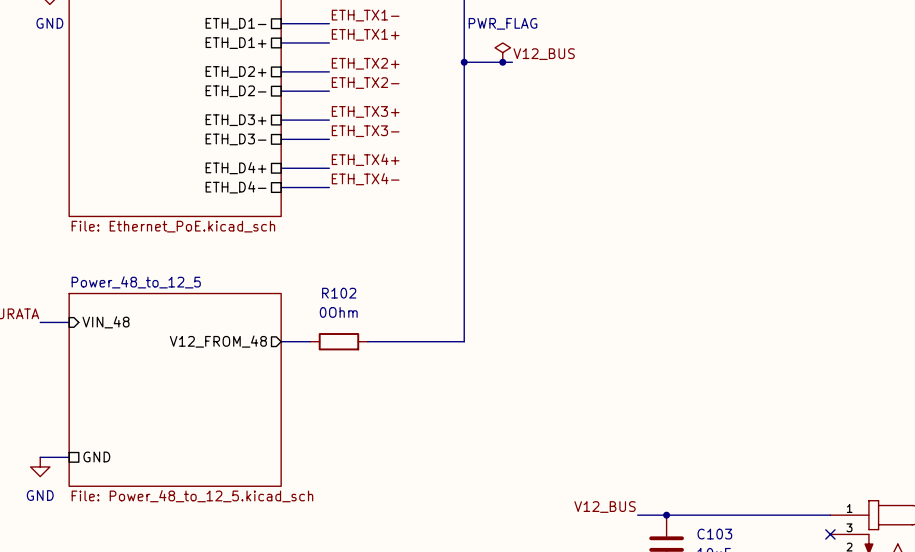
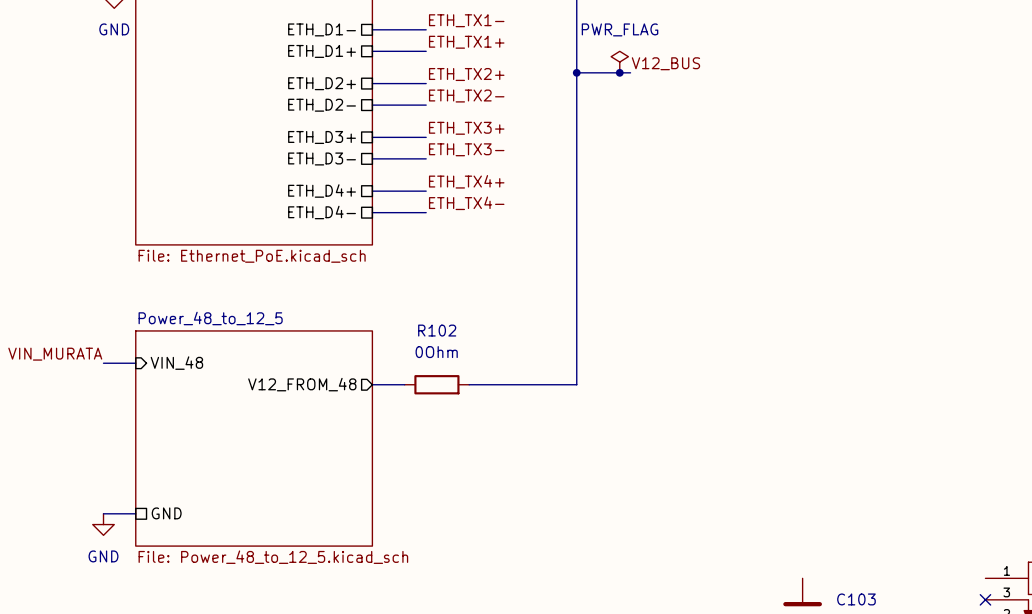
label: V12_BUS (605, 507) -> none
wire: (637, 515) (830, 515) -> none
junction: (666, 515) -> none

